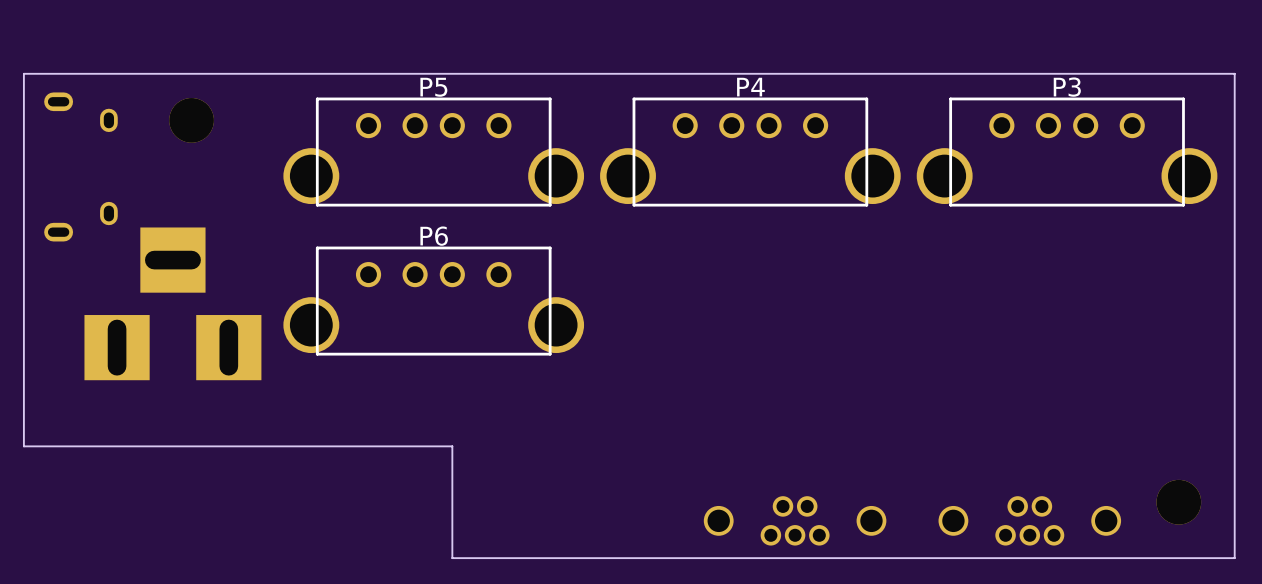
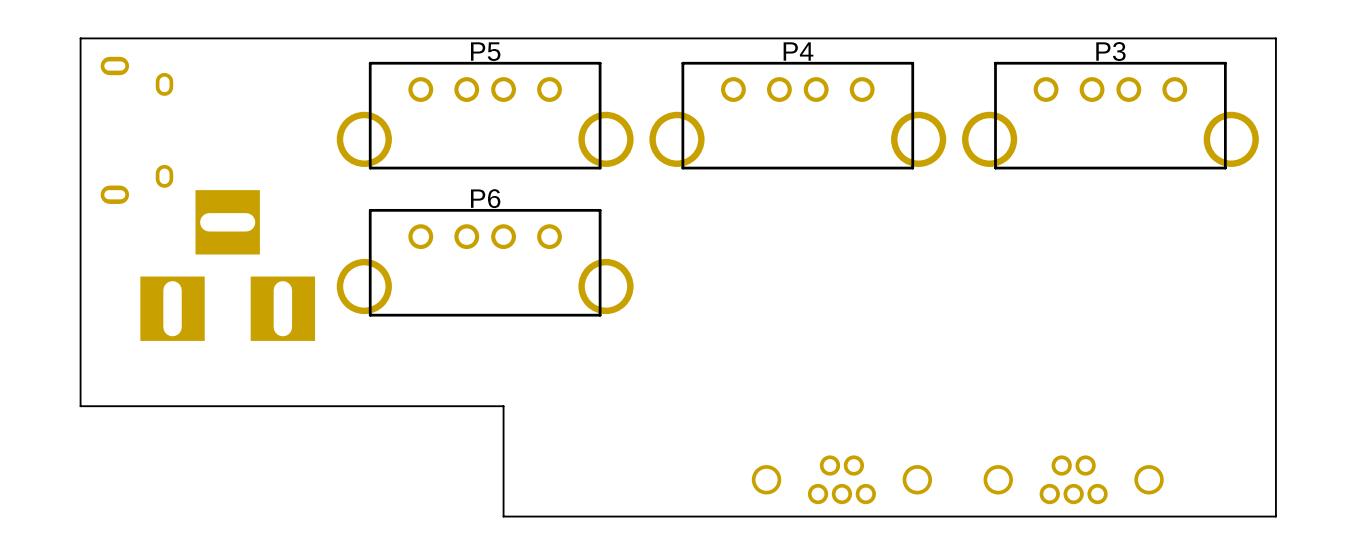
part: (191, 120) -> none
part: (1178, 502) -> none

